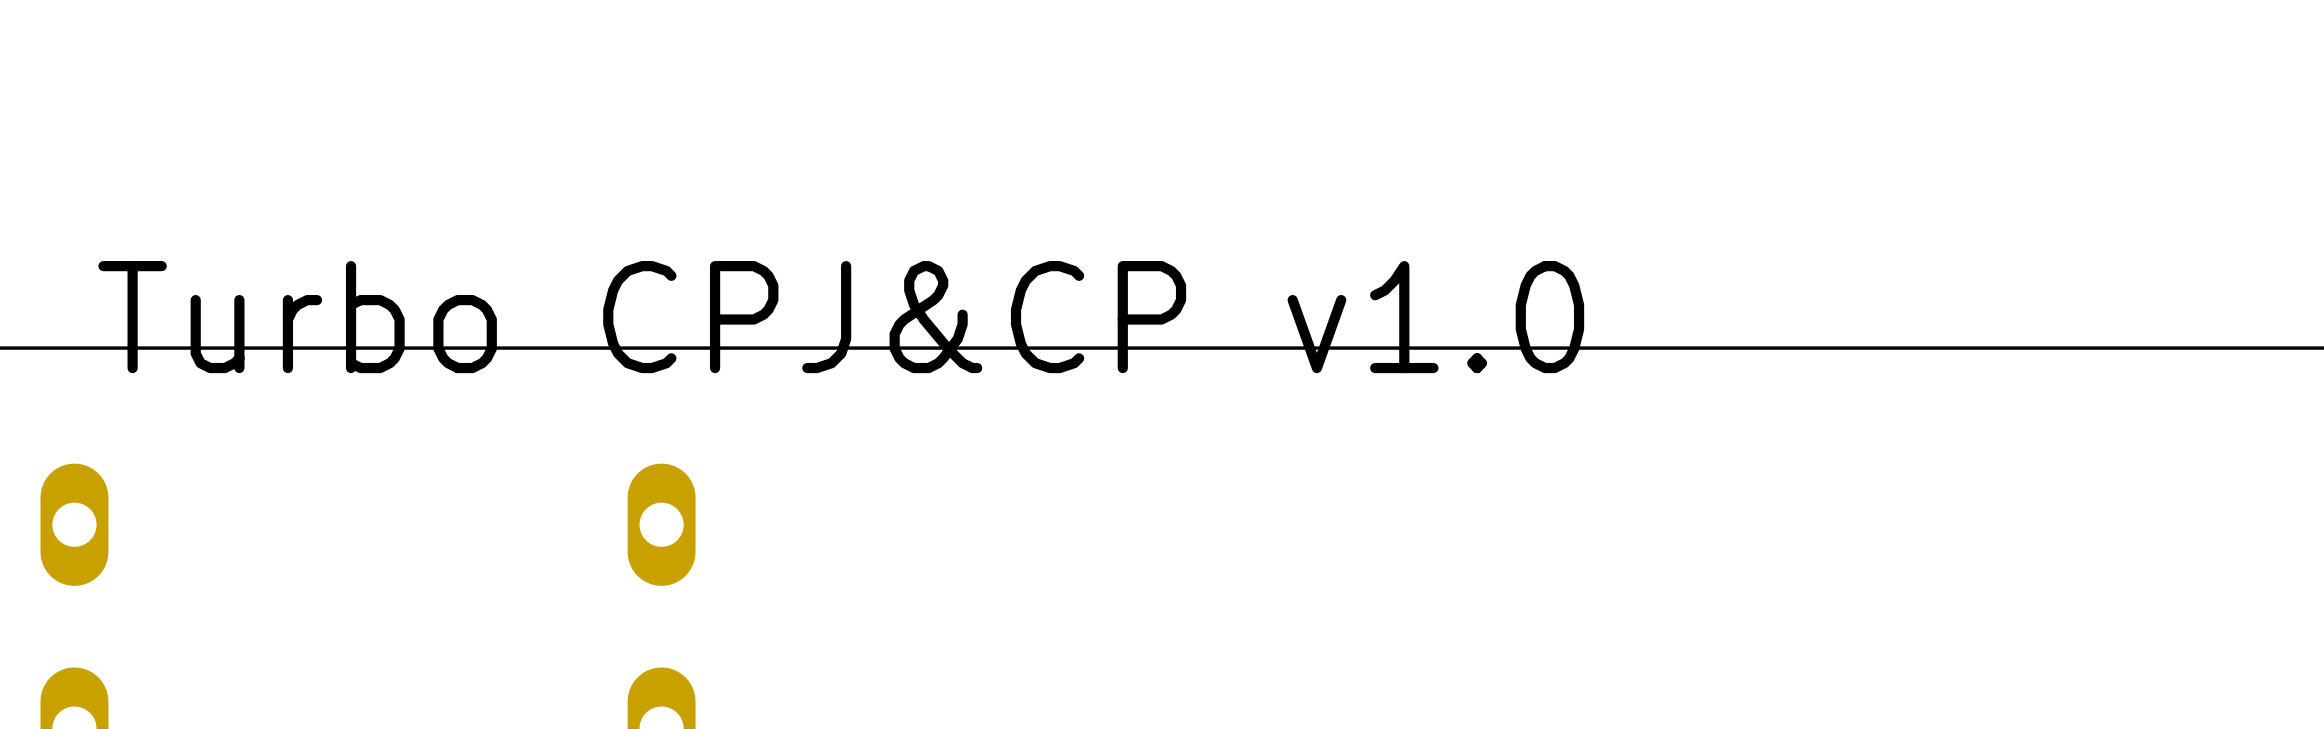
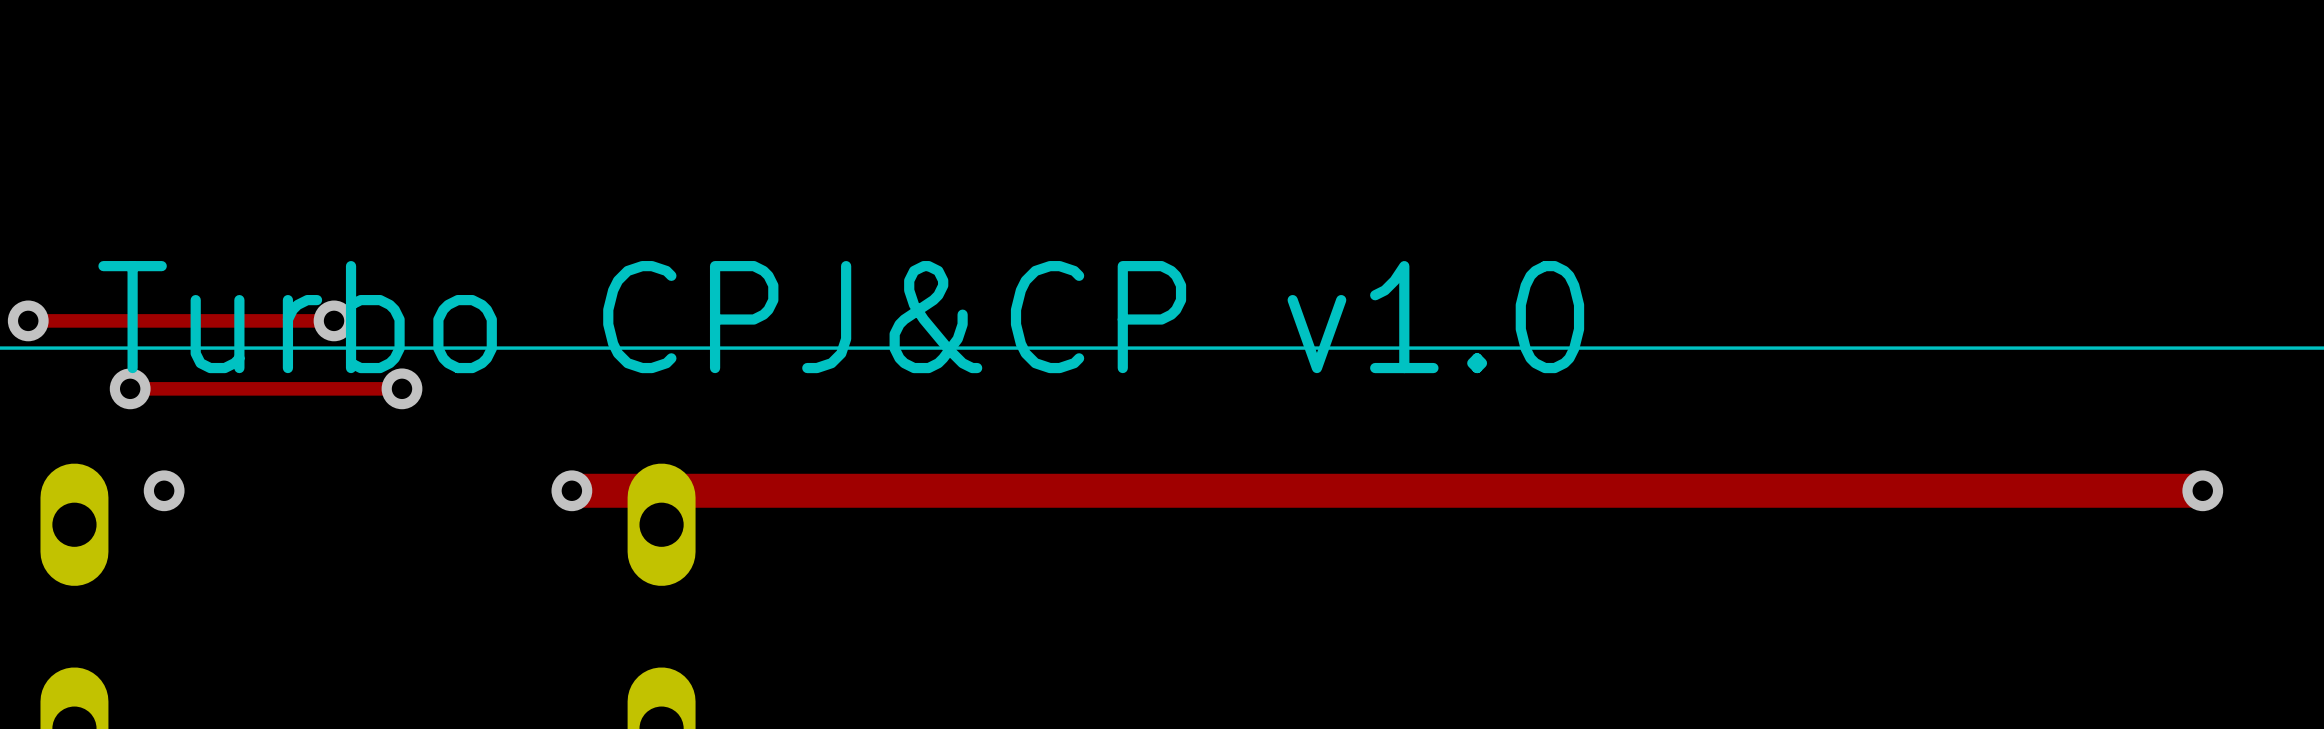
track: none -> (28, 320) (334, 320)
via: none -> (28, 320)
via: none -> (334, 320)
track: none -> (130, 388) (401, 388)
via: none -> (130, 388)
via: none -> (401, 388)
via: none -> (164, 490)
track: none -> (571, 490) (2202, 490)
via: none -> (571, 490)
via: none -> (2202, 490)

